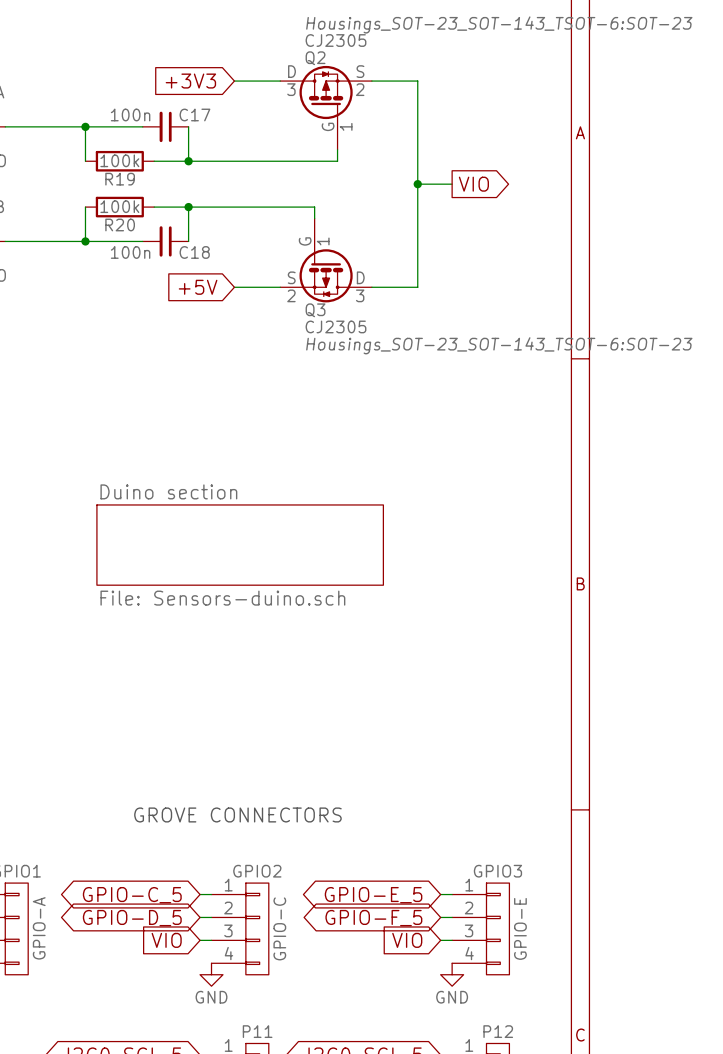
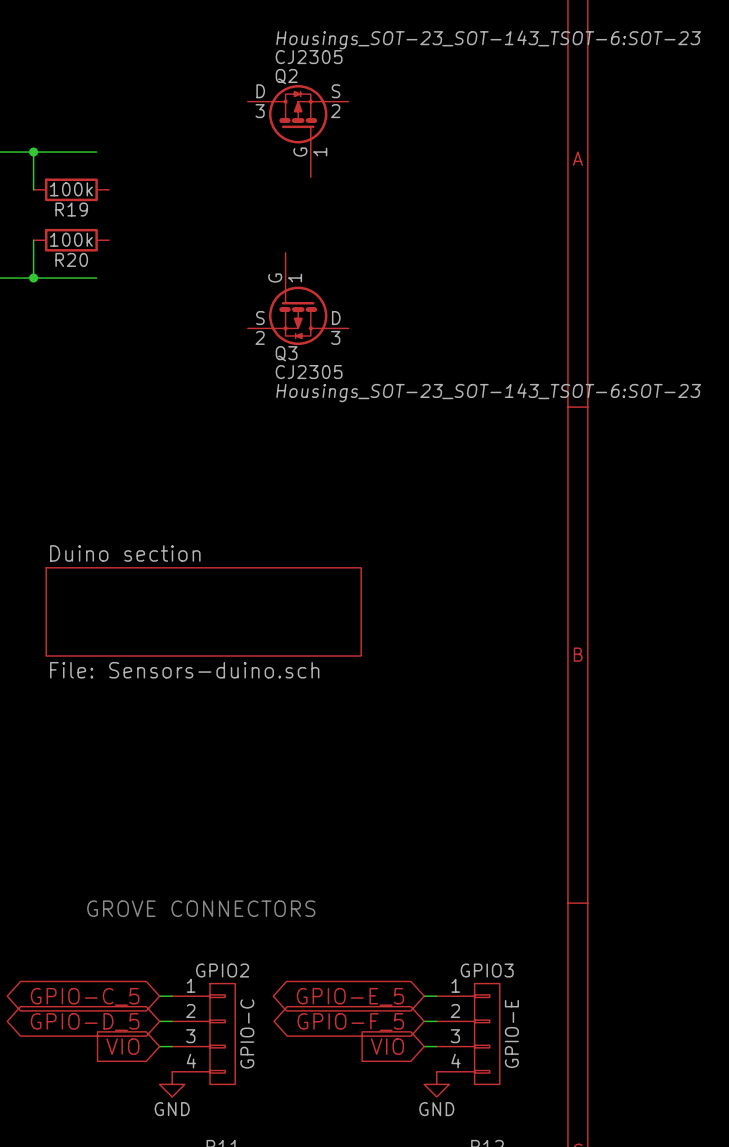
global label: +3V3 (190, 81) -> none
wire: (234, 81) (280, 81) -> none
wire: (371, 81) (417, 81) (417, 287) (371, 287) -> none
C17: 100n (165, 126) -> none
wire: (188, 126) (188, 161) -> none
wire: (337, 149) (337, 161) (154, 161) -> none
junction: (188, 161) -> none
wire: (417, 184) (452, 184) -> none
junction: (417, 184) -> none
global label: VIO (473, 184) -> none
wire: (154, 207) (314, 207) (314, 218) -> none
wire: (188, 207) (188, 241) -> none
junction: (188, 207) -> none
C18: 100n (165, 241) -> none
global label: +5V (198, 287) -> none
wire: (234, 287) (280, 287) -> none

